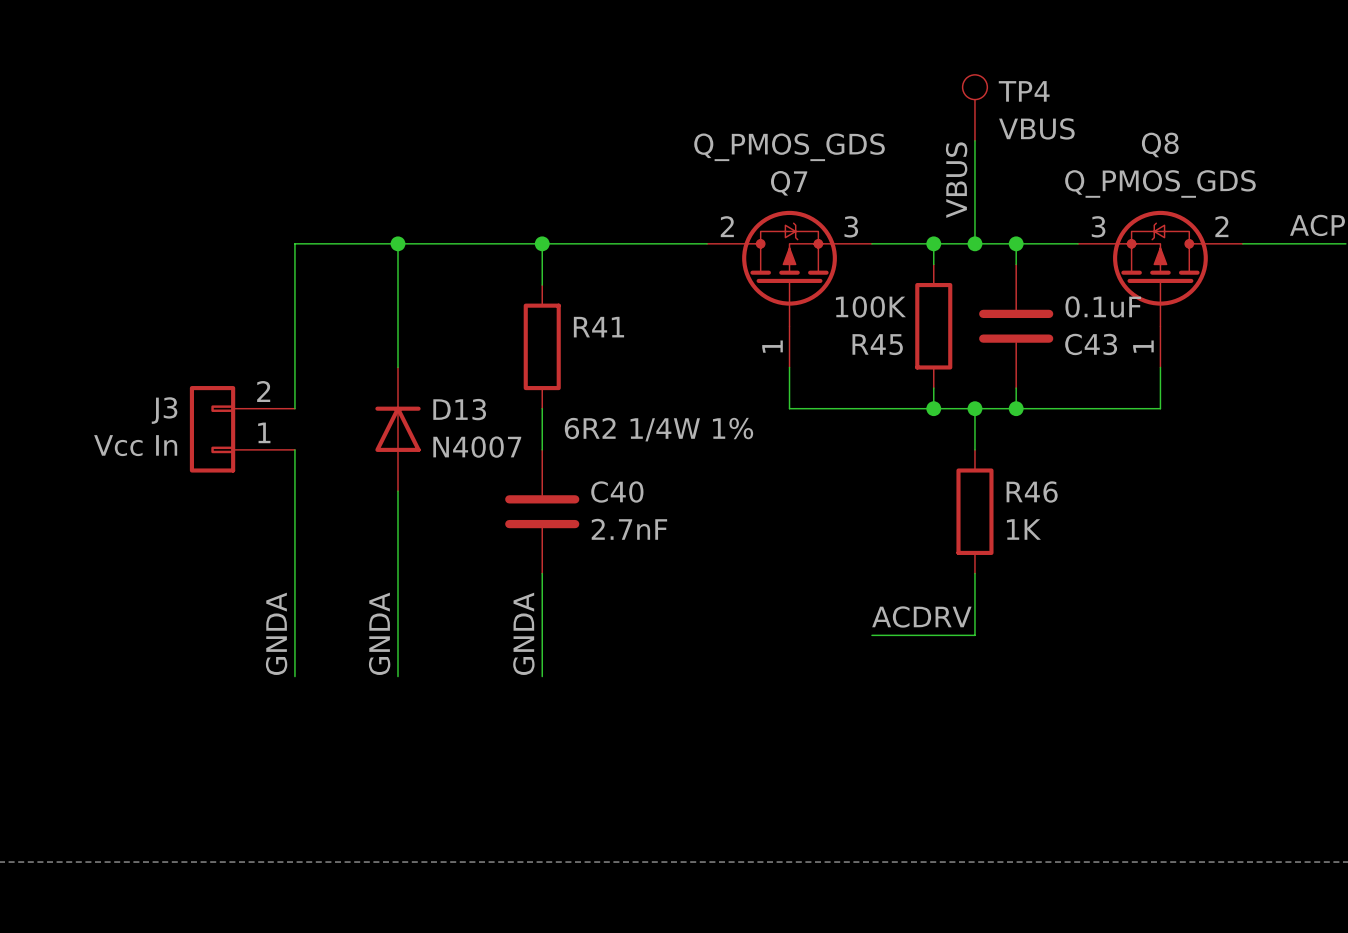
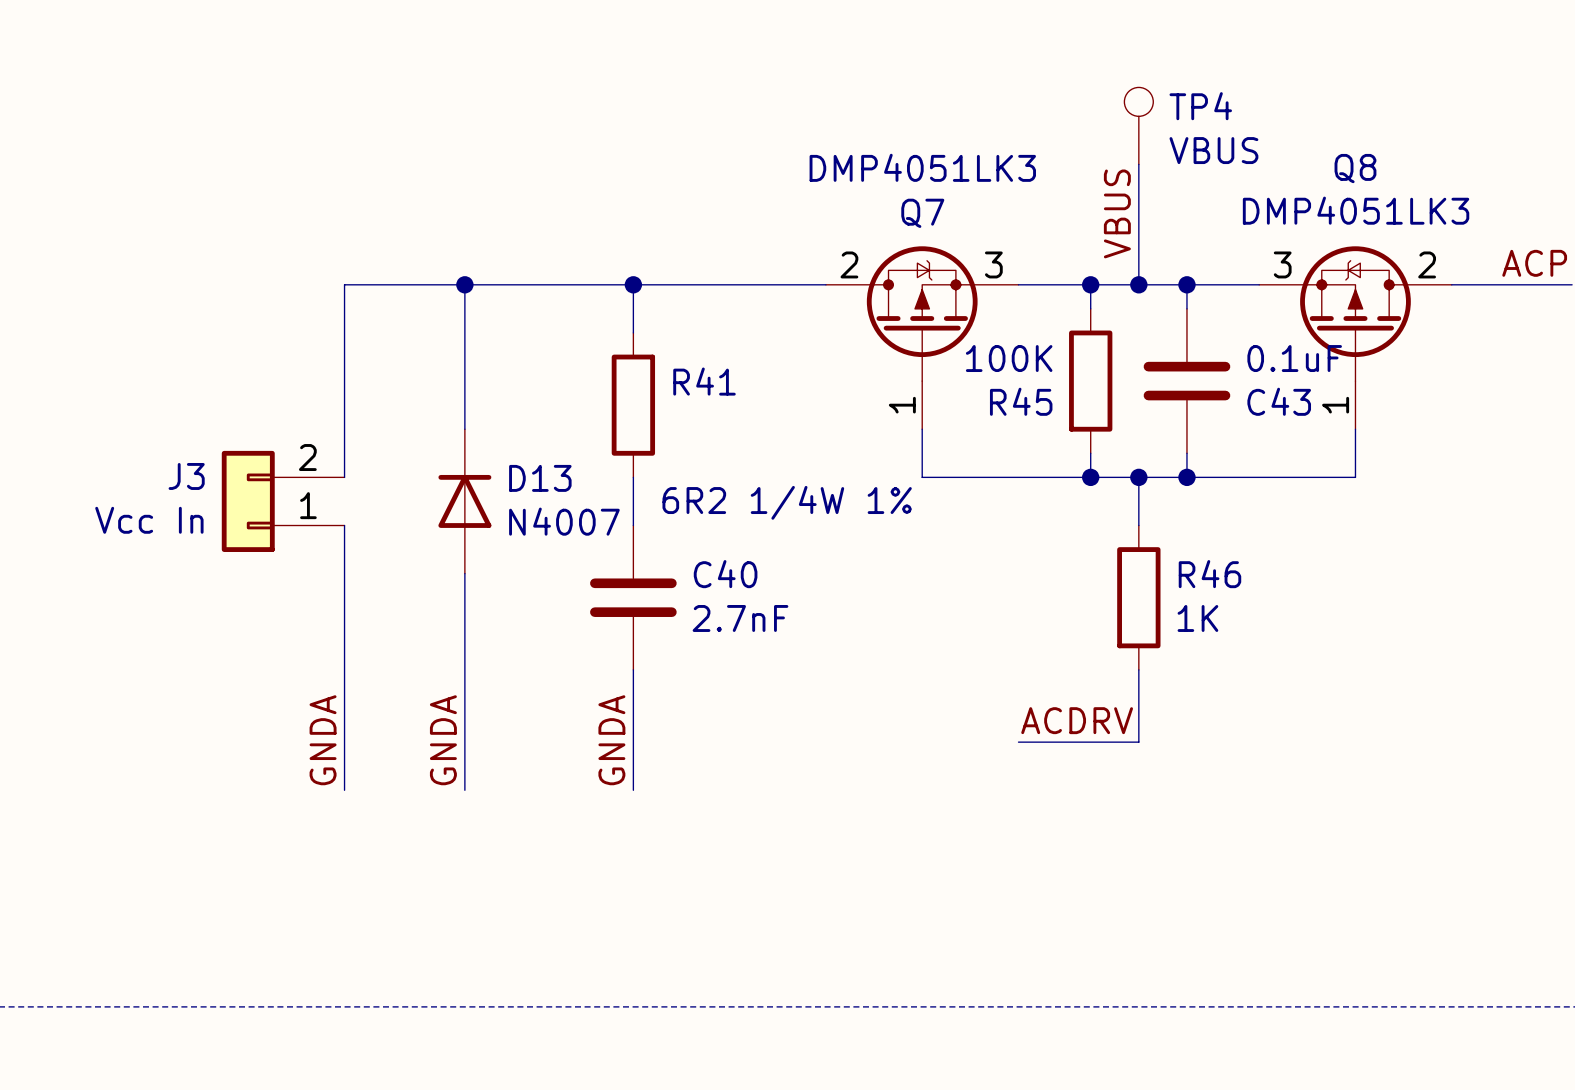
Q7 value: Q_PMOS_GDS (789, 147) -> DMP4051LK3 (922, 167)
Q8 value: Q_PMOS_GDS (1160, 183) -> DMP4051LK3 (1356, 210)

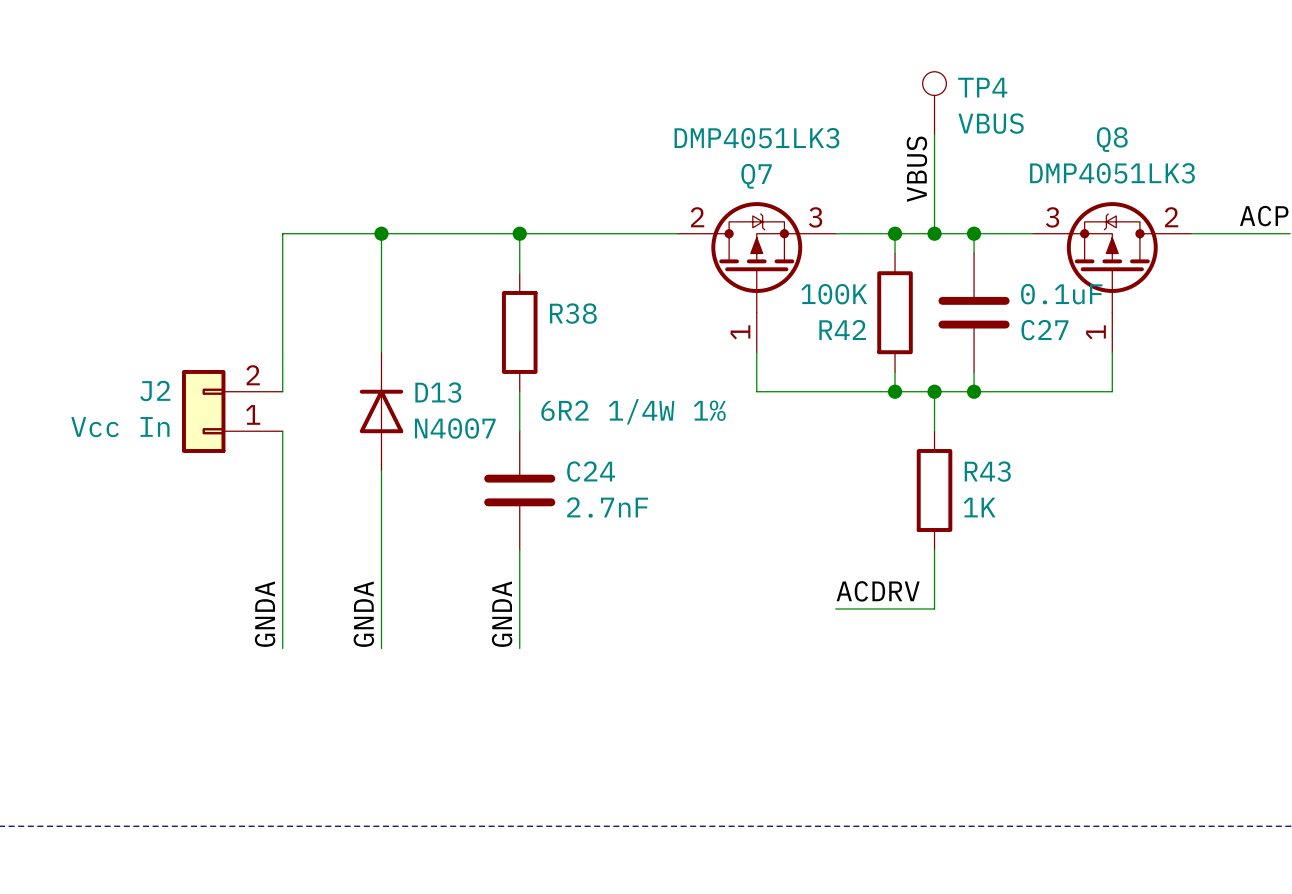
R41 name: R41 (704, 381) -> R38 (573, 313)
R45 name: R45 (1021, 401) -> R42 (842, 329)
C43 name: C43 (1279, 401) -> C27 (1044, 330)
J3 name: J3 (186, 476) -> J2 (155, 390)
C40 name: C40 (725, 574) -> C24 (591, 471)
R46 name: R46 (1209, 574) -> R43 (987, 471)

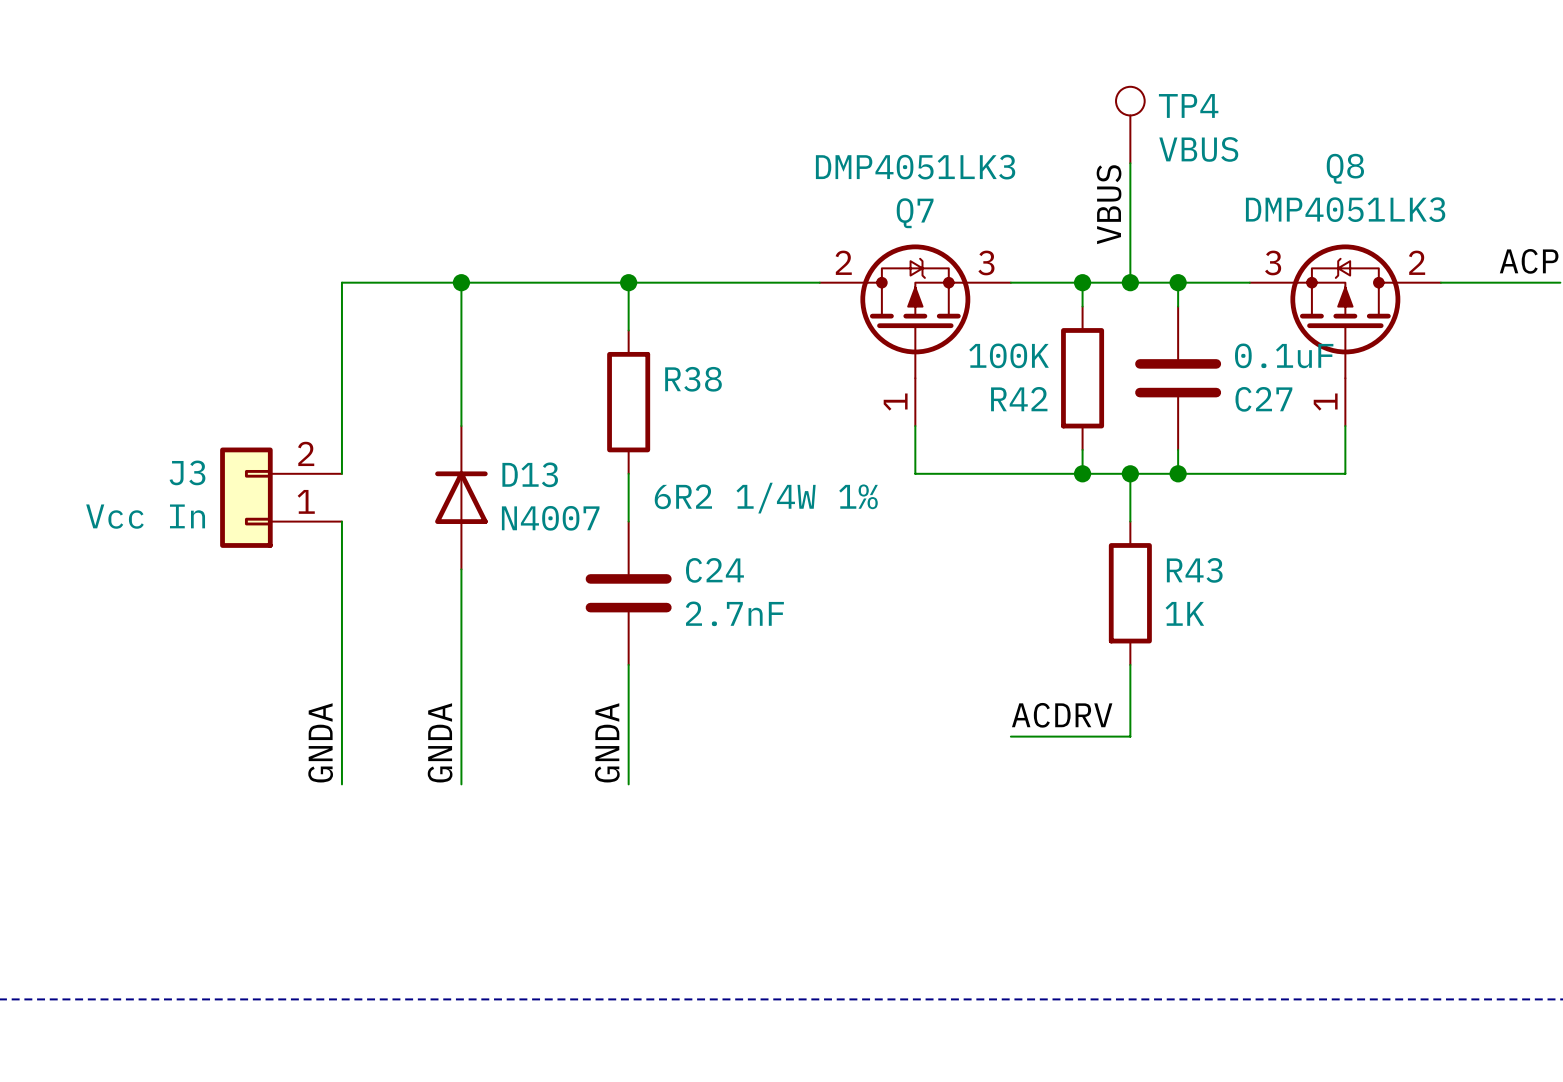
J2 name: J2 (155, 390) -> J3 (187, 472)

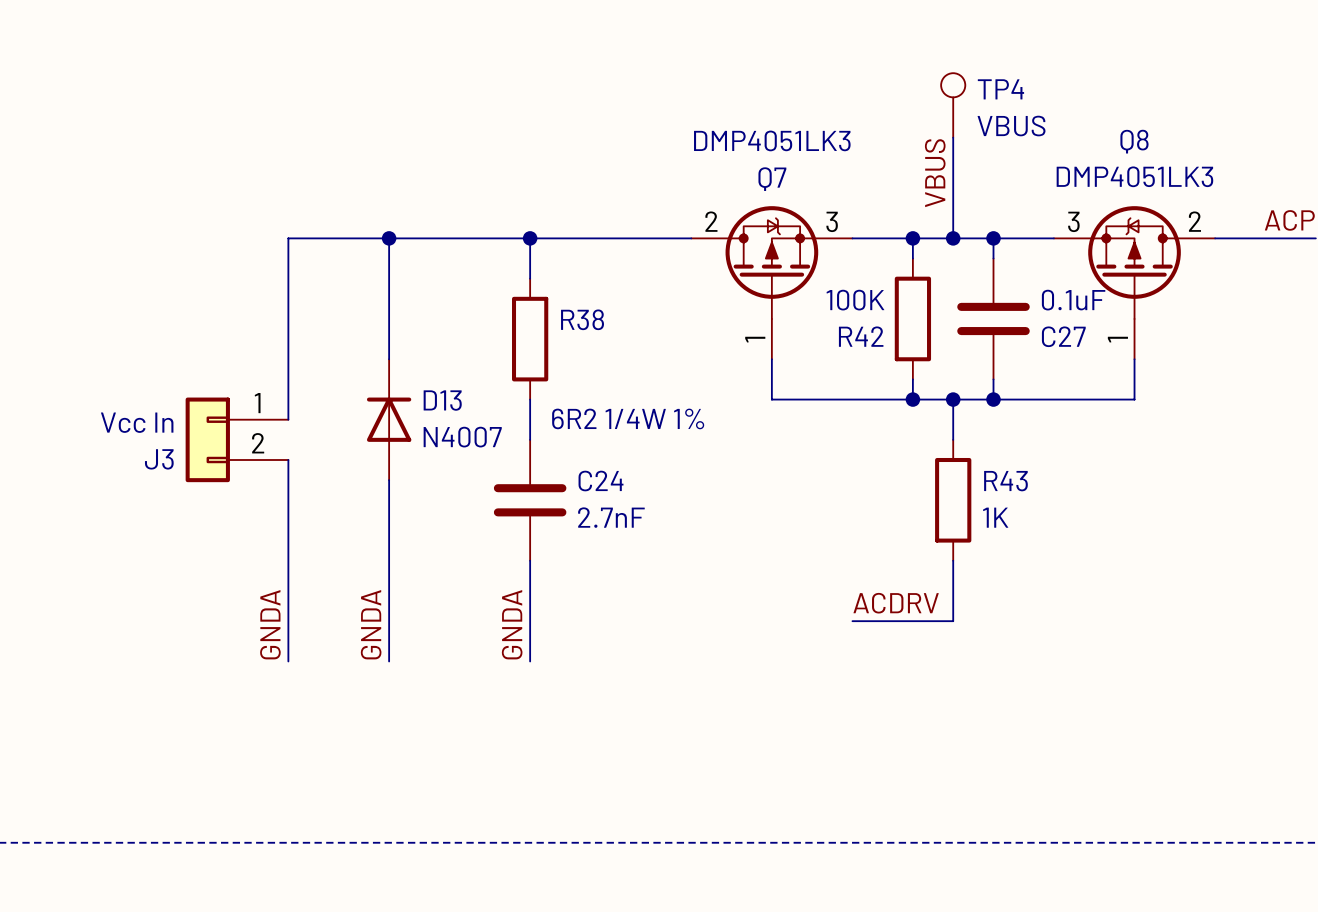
J3 flip: as is (246, 497) -> up-down (207, 439)
wire: (341, 521) (341, 545) -> (288, 399) (288, 419)

